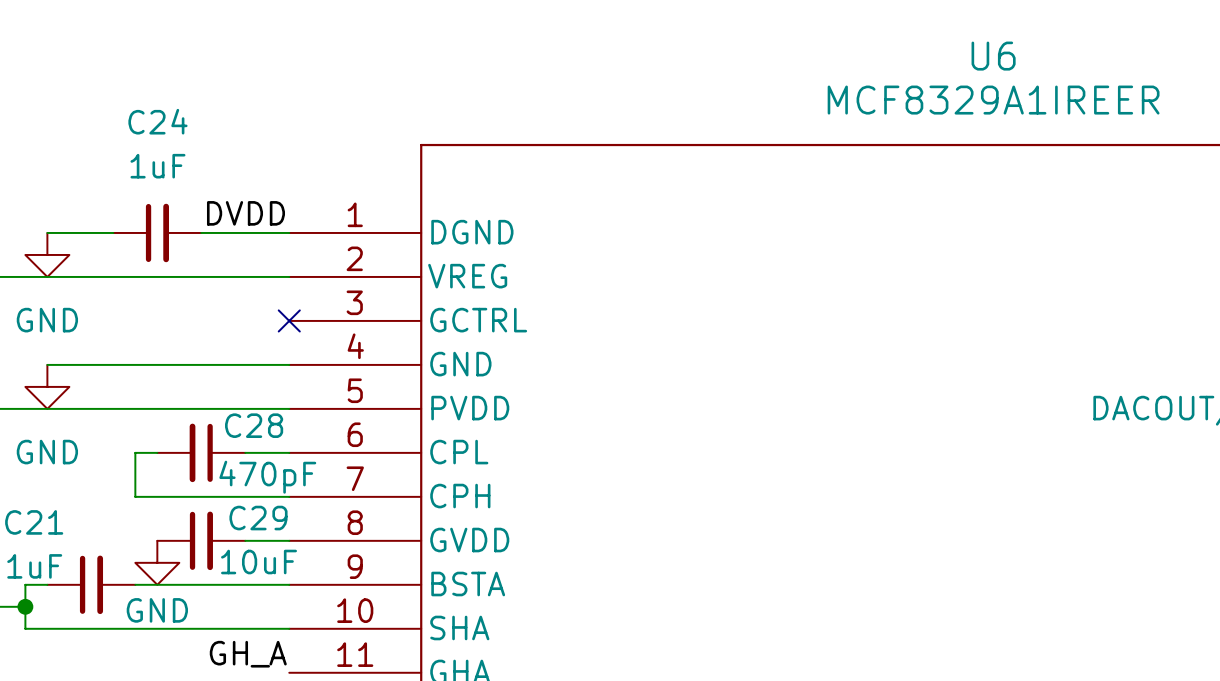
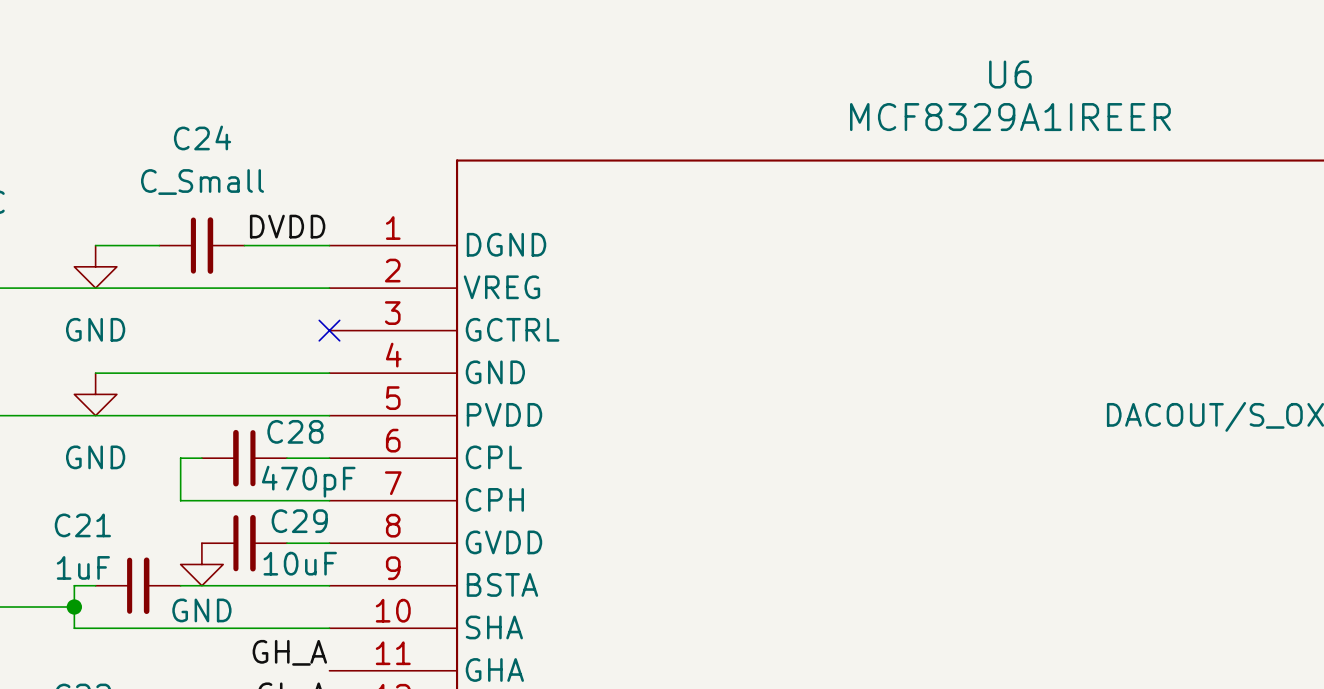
C24 value: 1uF (157, 166) -> C_Small (202, 182)

